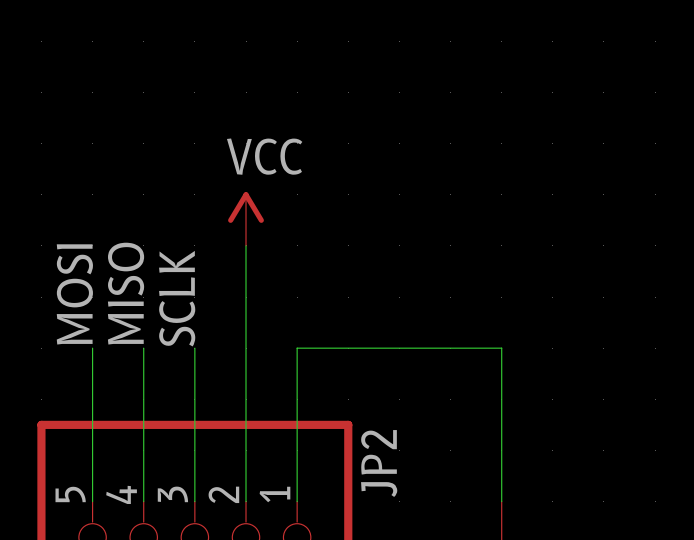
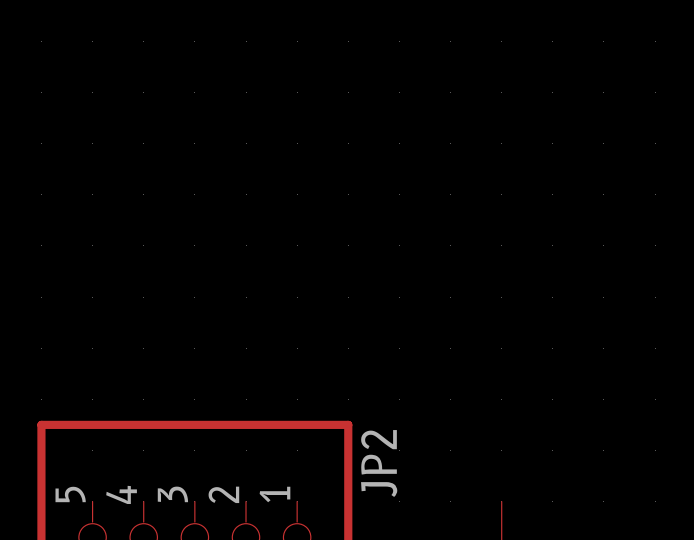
power symbol: VCC (246, 219) -> none
wire: (246, 245) (246, 501) -> none
label: MISO (126, 293) -> none
label: MOSI (74, 294) -> none
label: SCLK (177, 298) -> none
wire: (92, 348) (92, 501) -> none
wire: (143, 348) (143, 501) -> none
wire: (194, 348) (194, 501) -> none
wire: (297, 501) (297, 348) (501, 348) (501, 501) -> none

